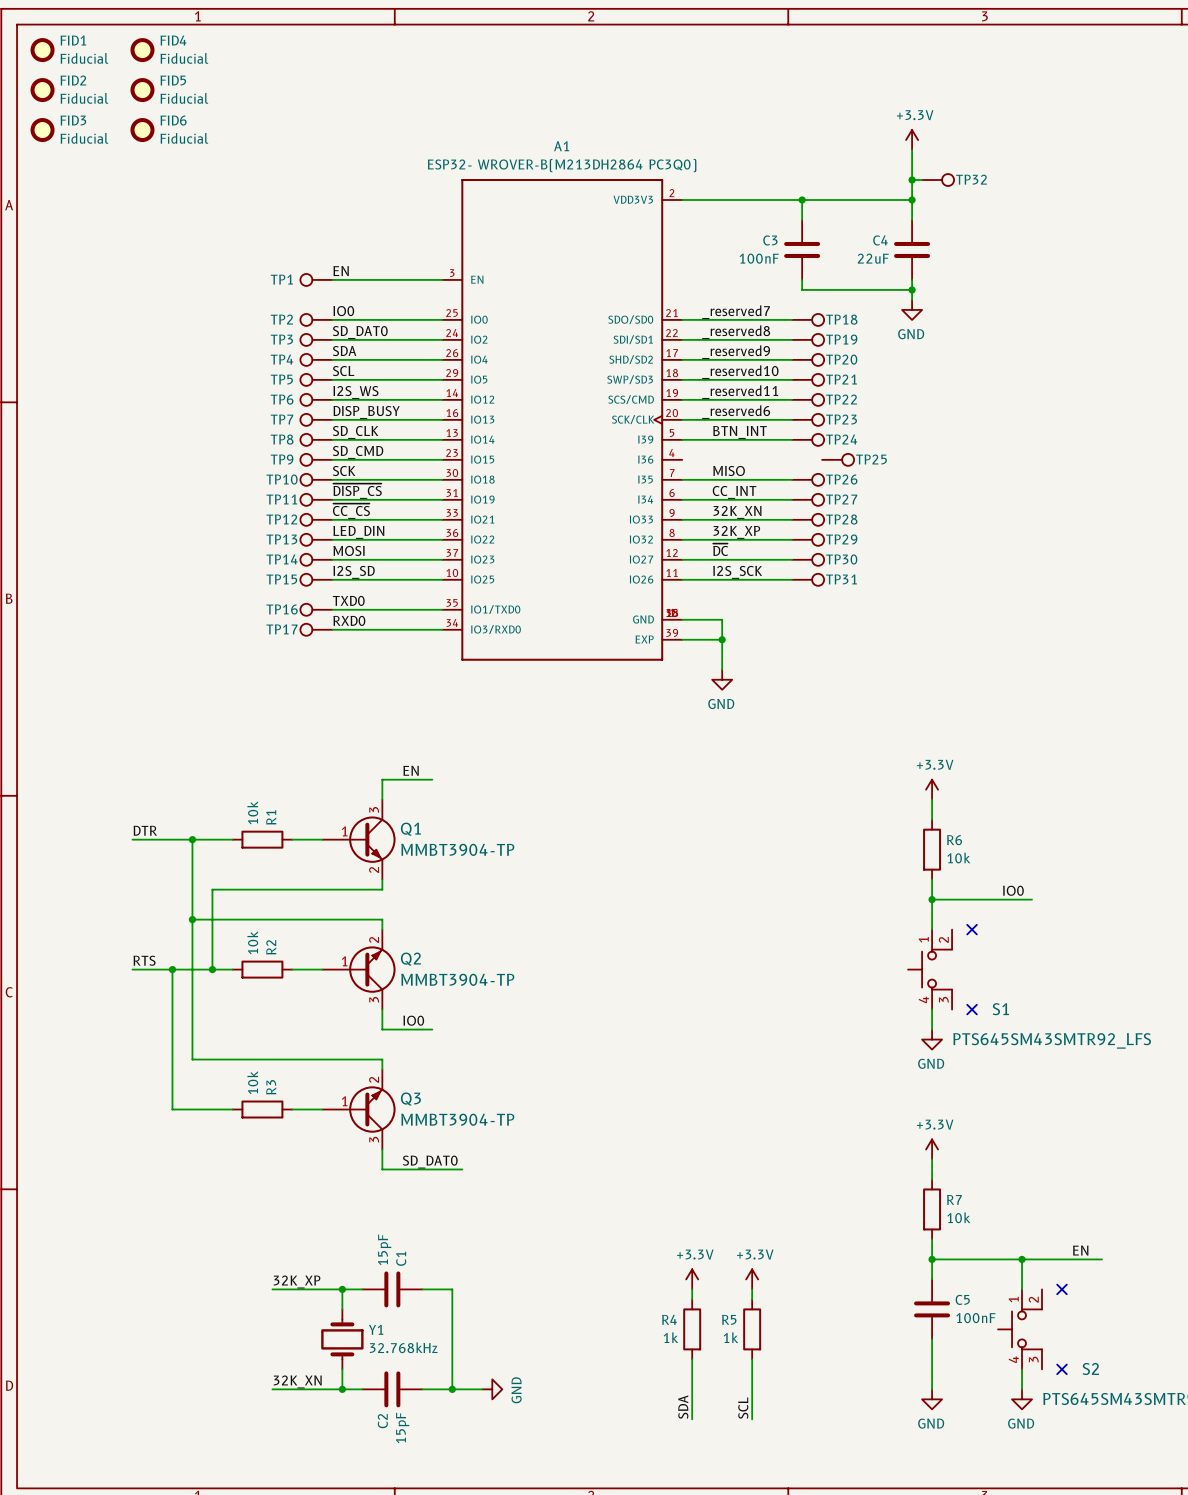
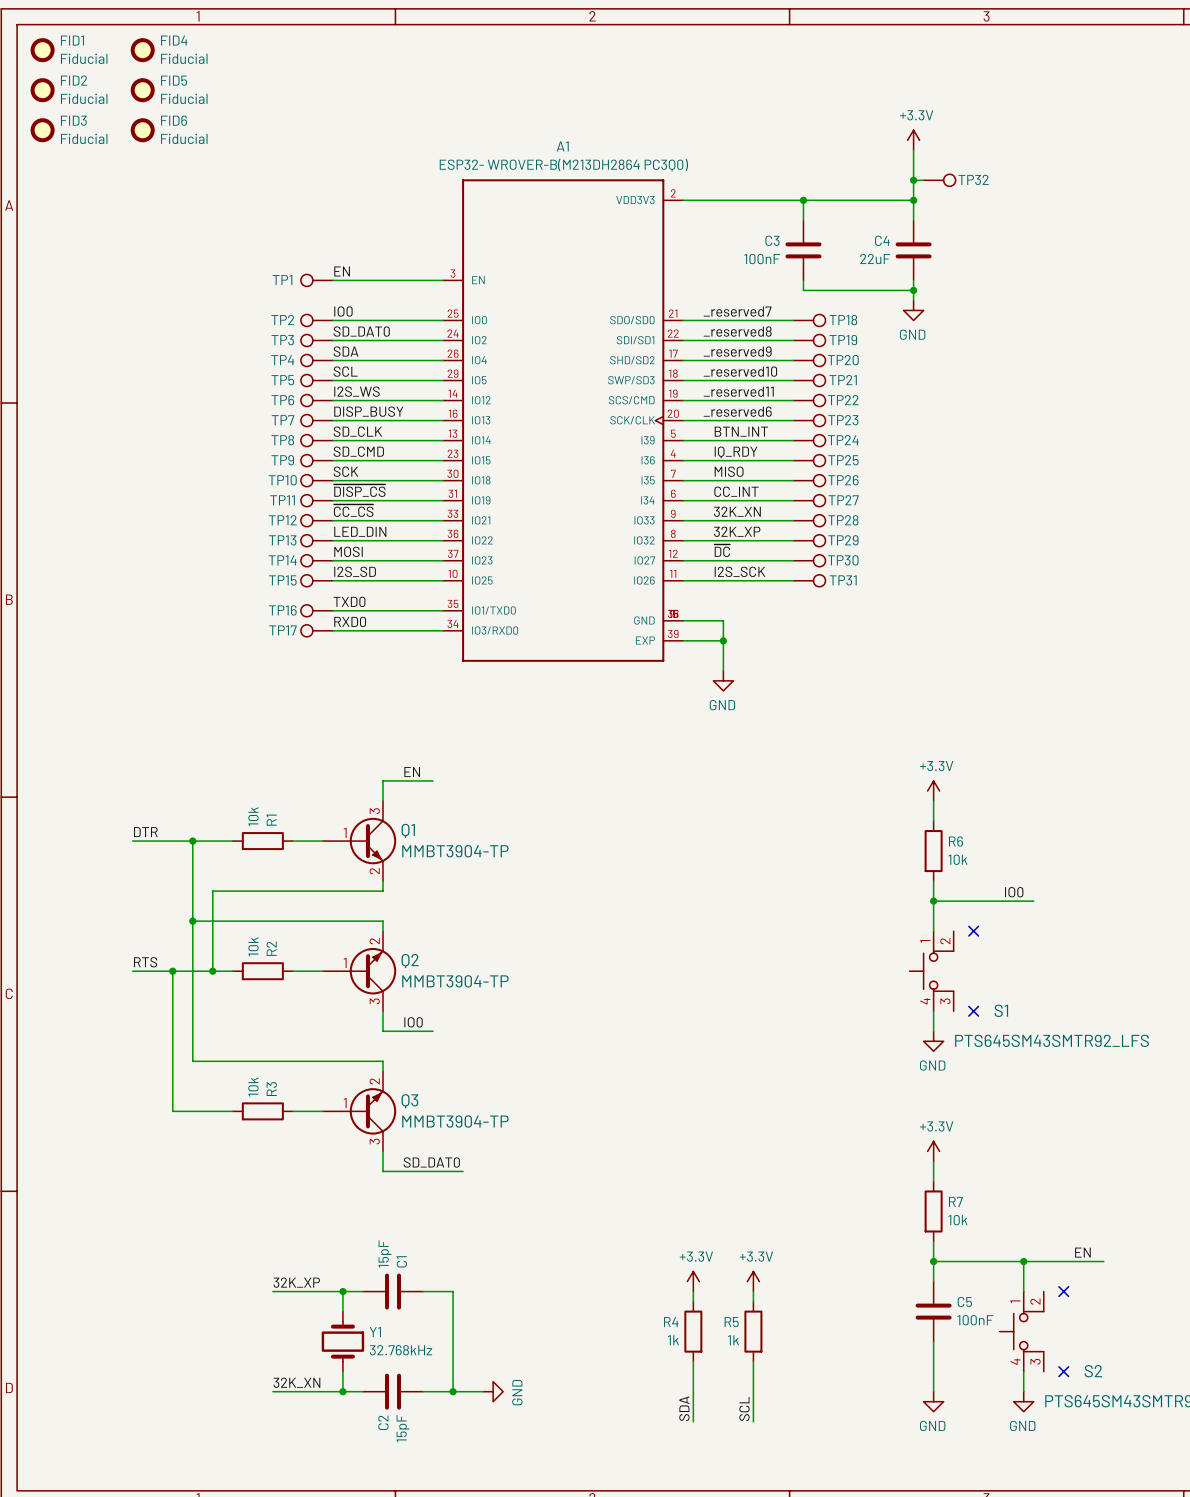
label: none -> IQ_RDY (736, 452)
wire: none -> (683, 460) (793, 460)
TP25 position: (838, 459) -> (809, 460)

